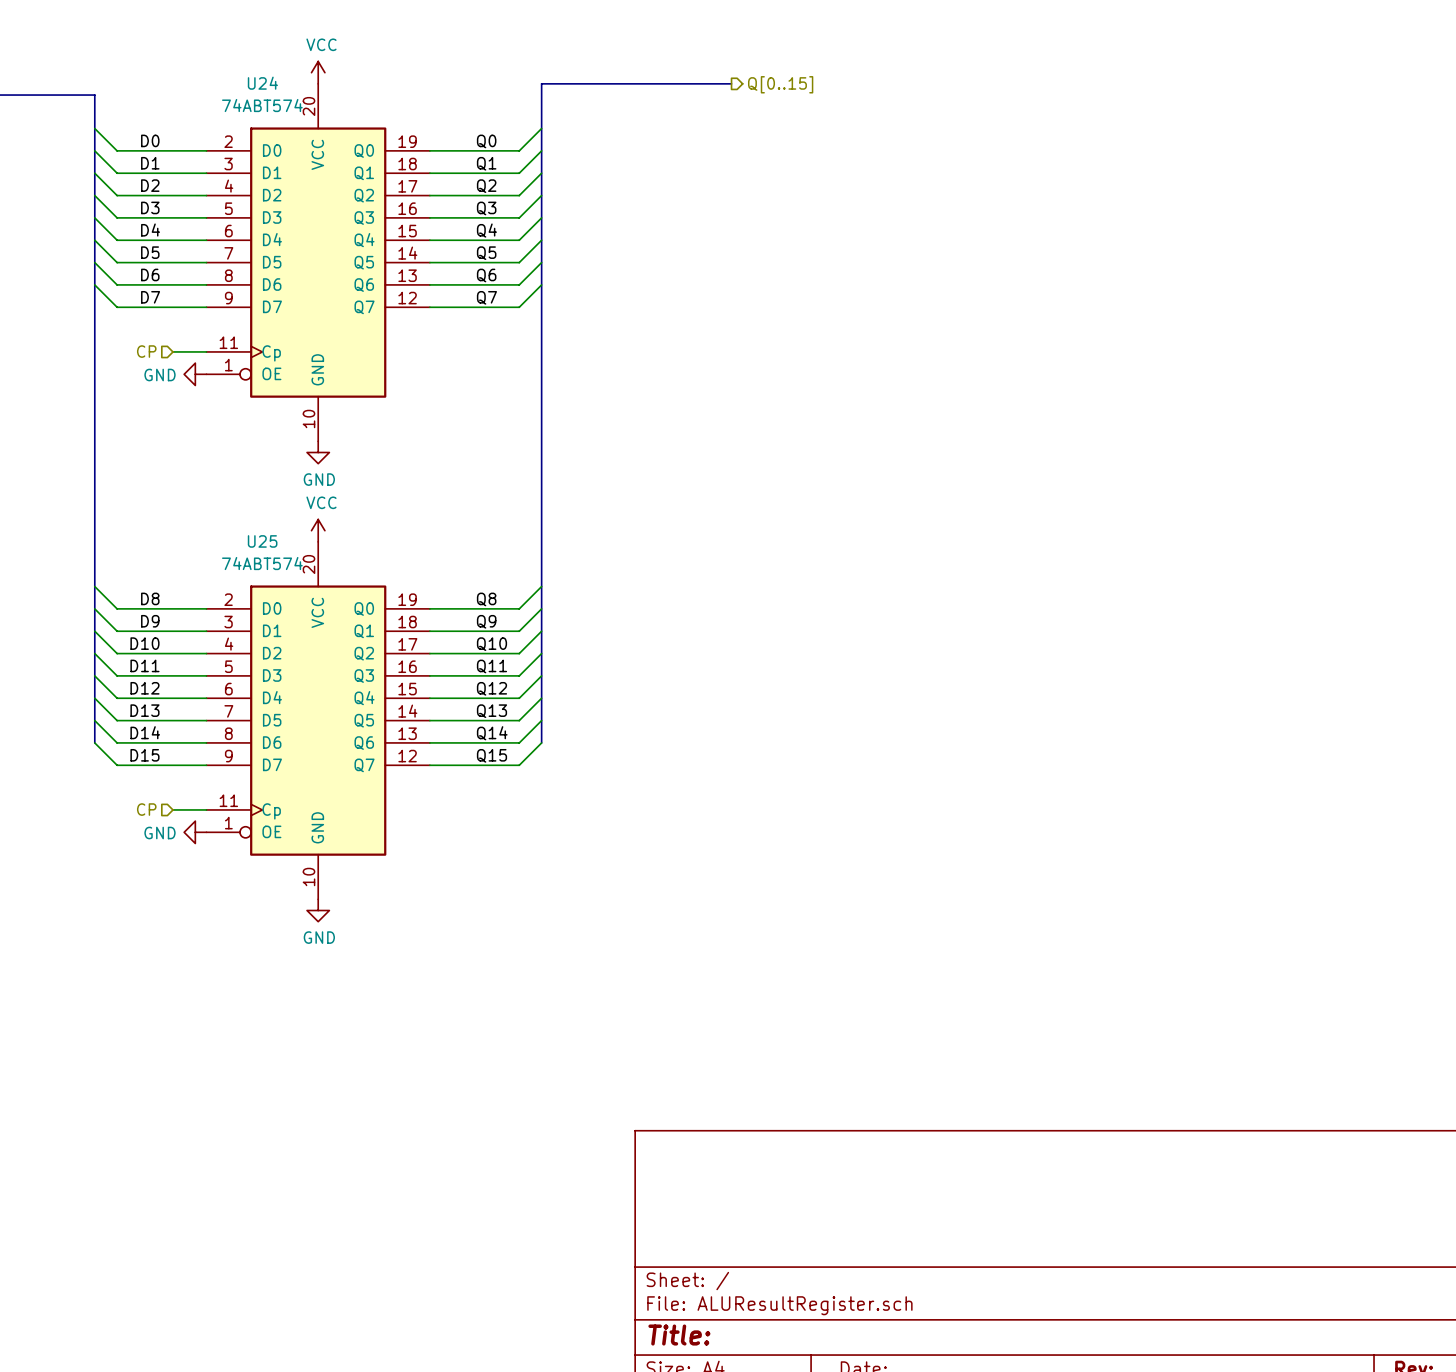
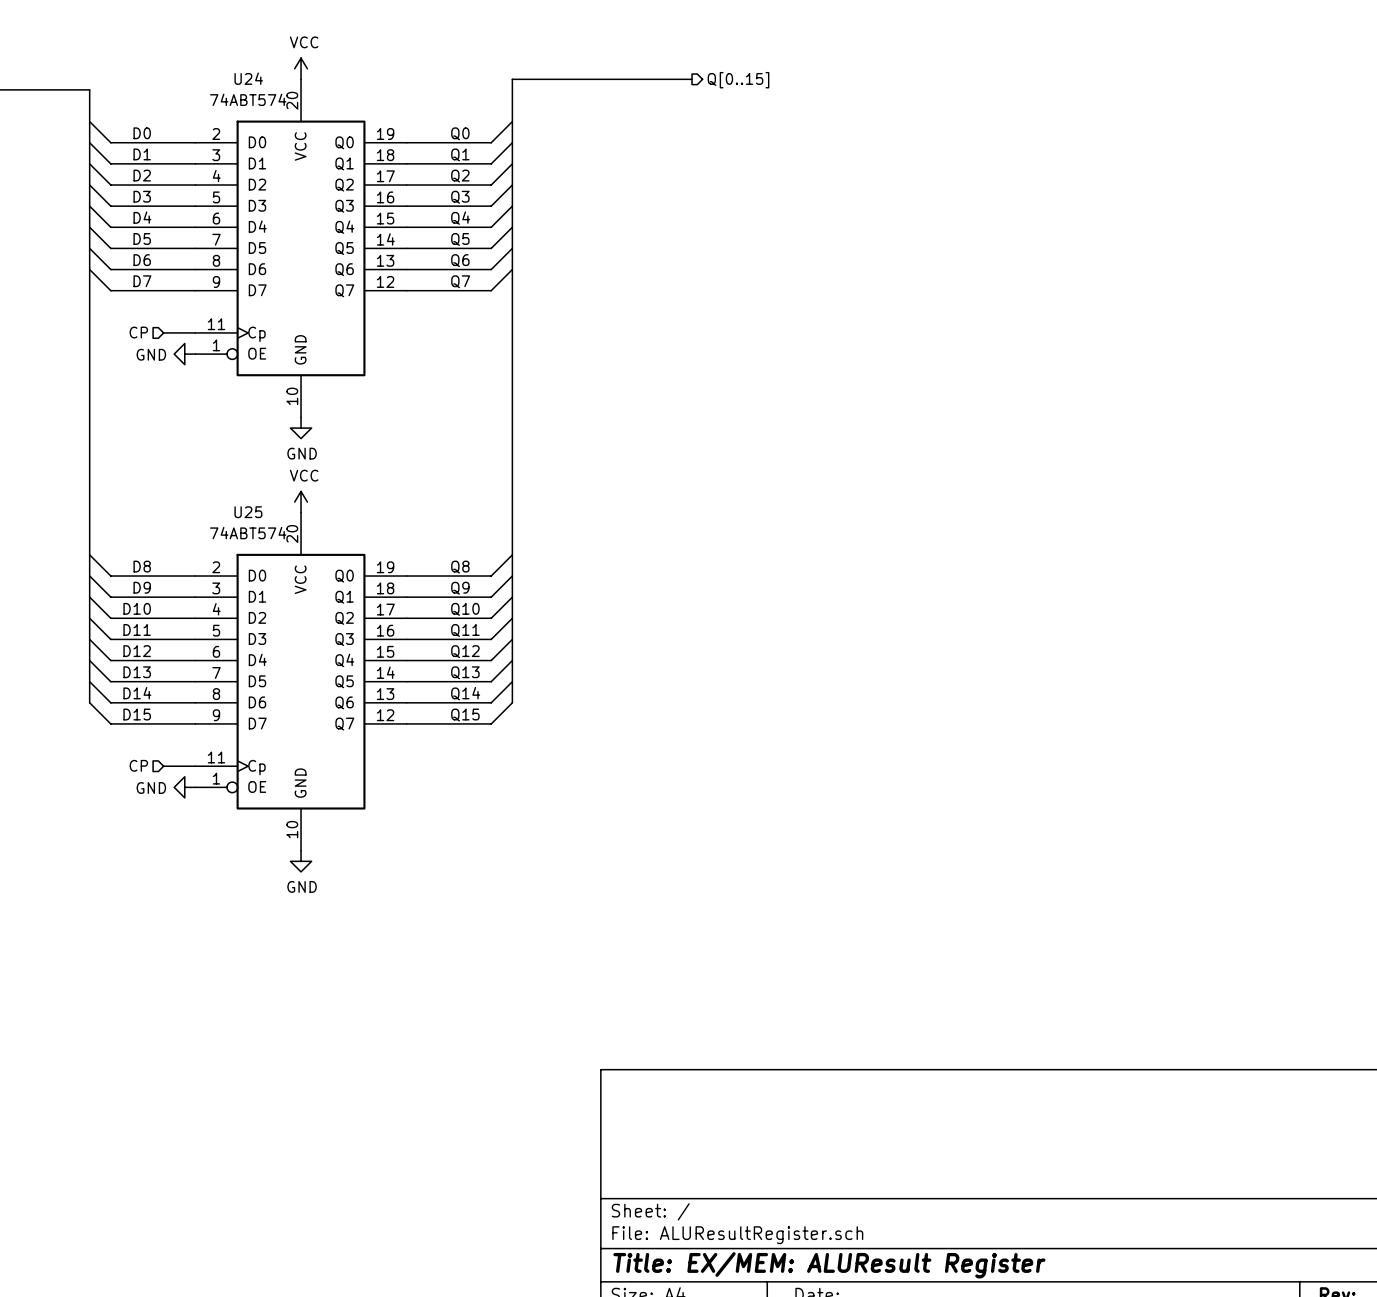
title block: Title: (679, 1335) -> Title: EX/MEM: ALUResult Register (829, 1265)

